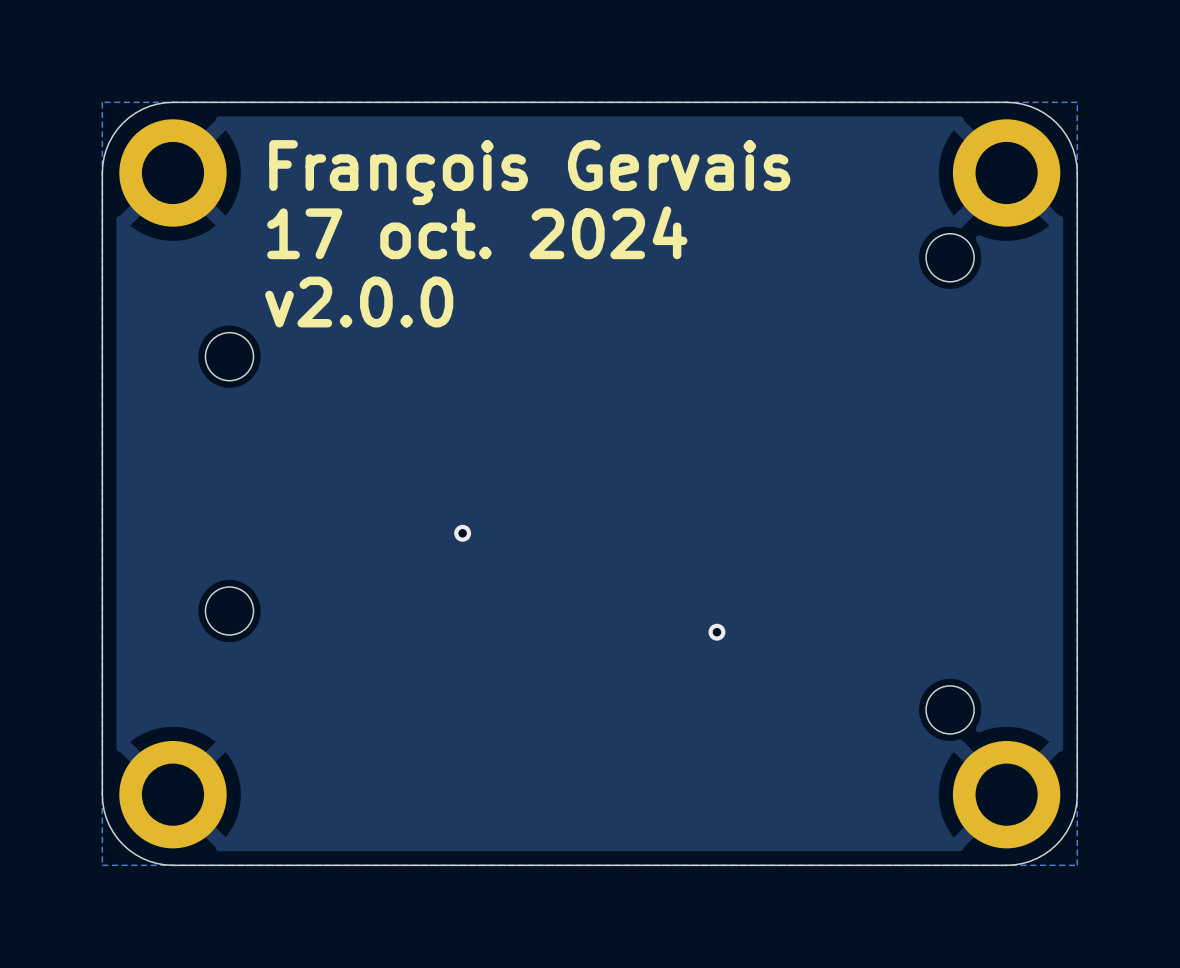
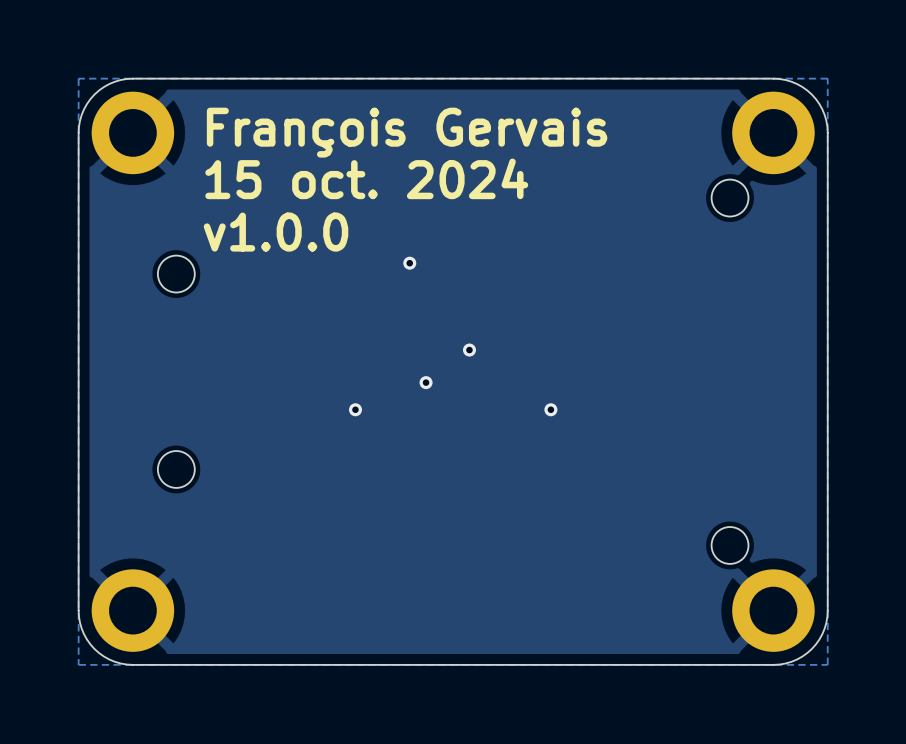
text: 17 oct. 2024 (477, 232) -> 15 oct. 2024 (366, 178)
text: v2.0.0 (359, 302) -> v1.0.0 (276, 232)
via: none -> (409, 263)
via: none -> (469, 350)
via: none -> (426, 382)
via position: (716, 632) -> (550, 409)

